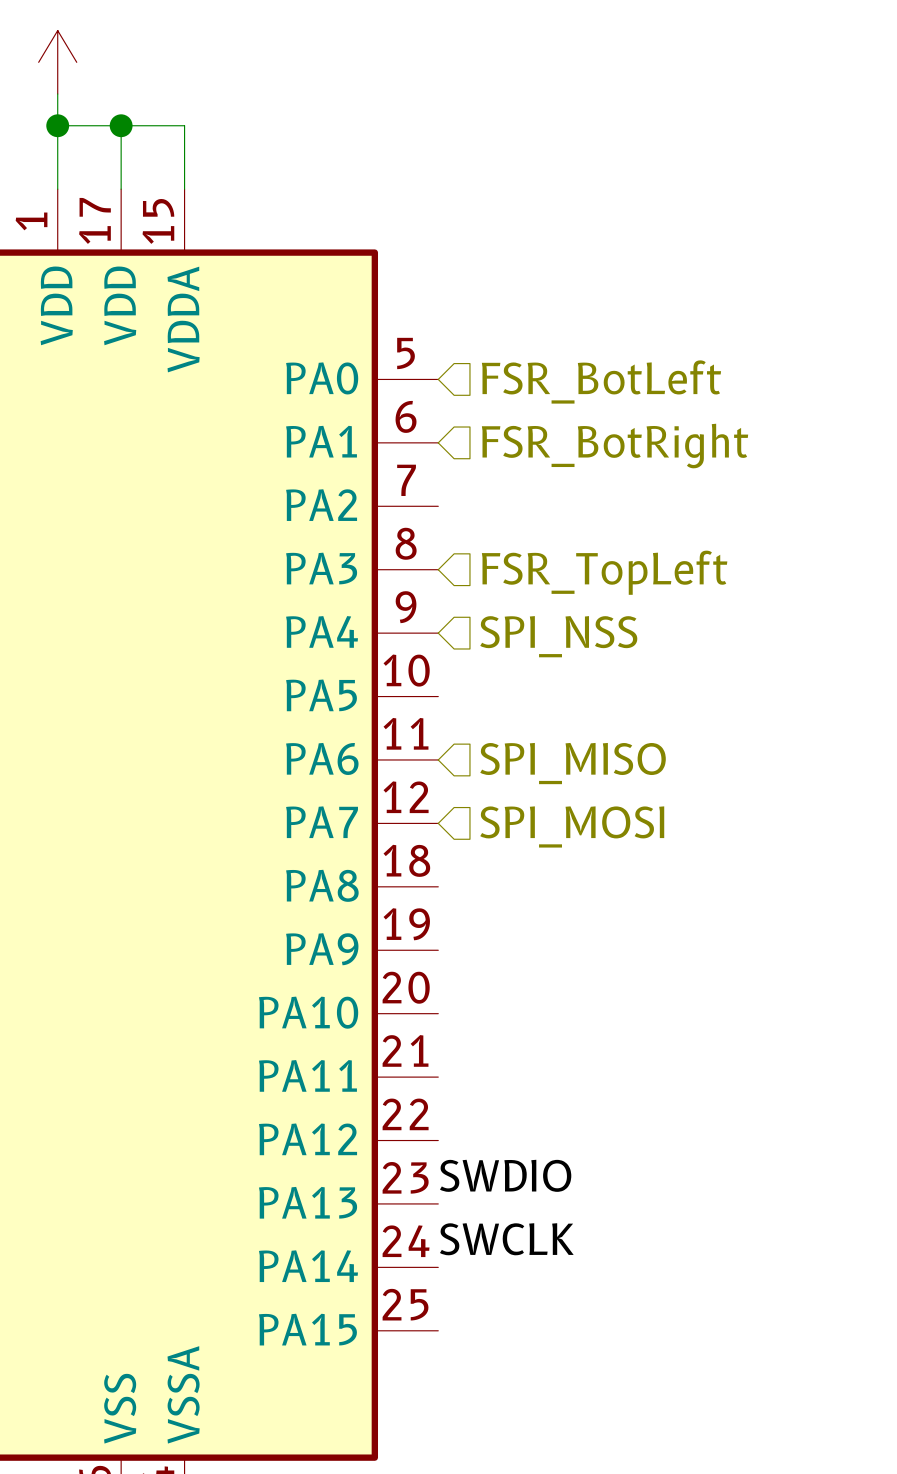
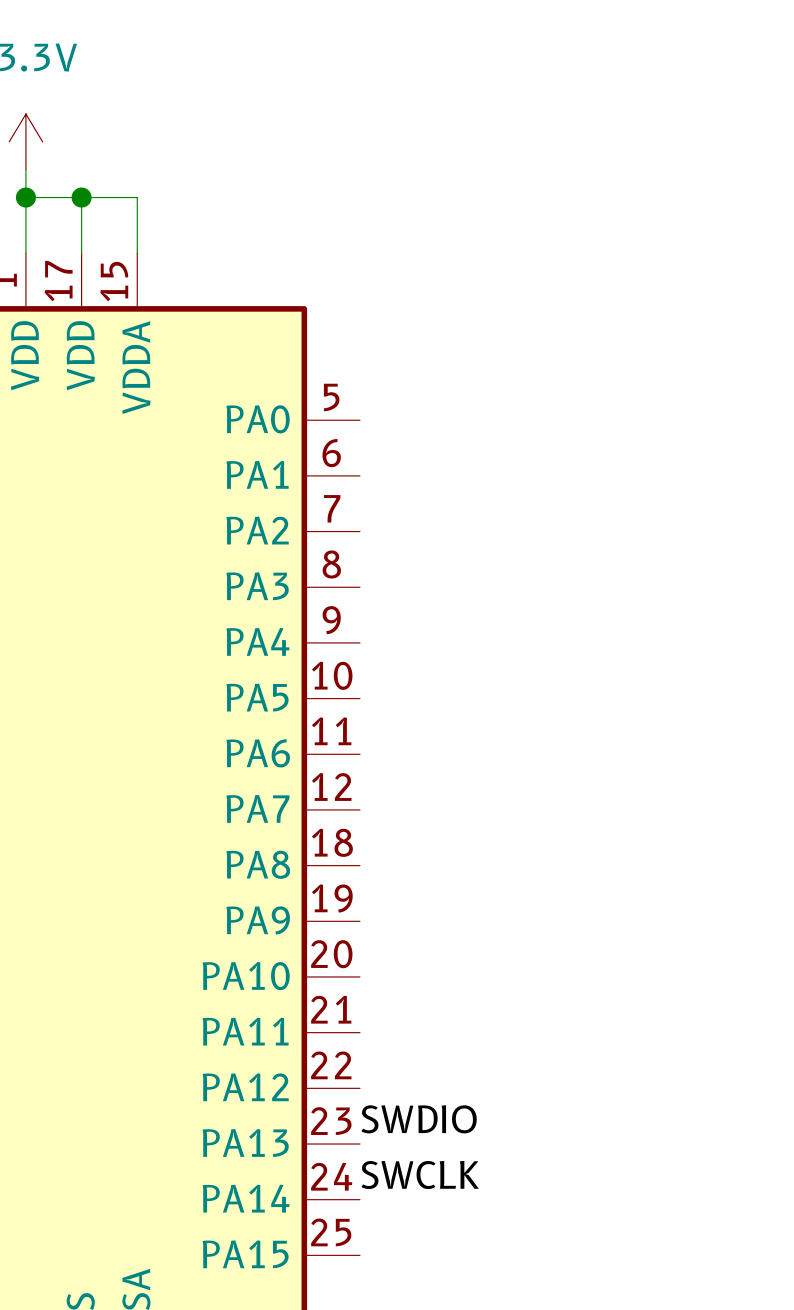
hierarchical label: FSR_BotLeft (601, 381) -> none
hierarchical label: FSR_BotRight (615, 446) -> none
hierarchical label: FSR_TopLeft (604, 572) -> none
hierarchical label: SPI_NSS (558, 636) -> none
hierarchical label: SPI_MISO (573, 763) -> none
hierarchical label: SPI_MOSI (572, 826) -> none

